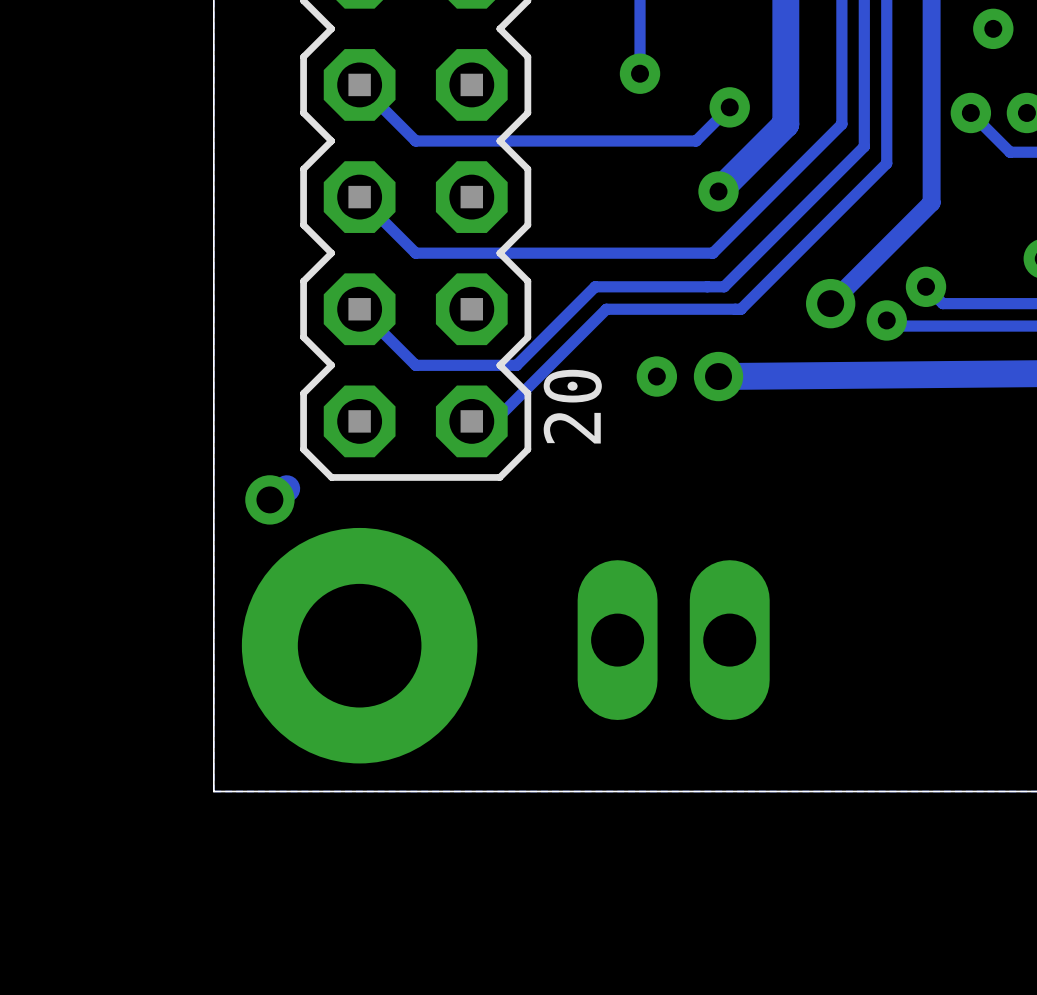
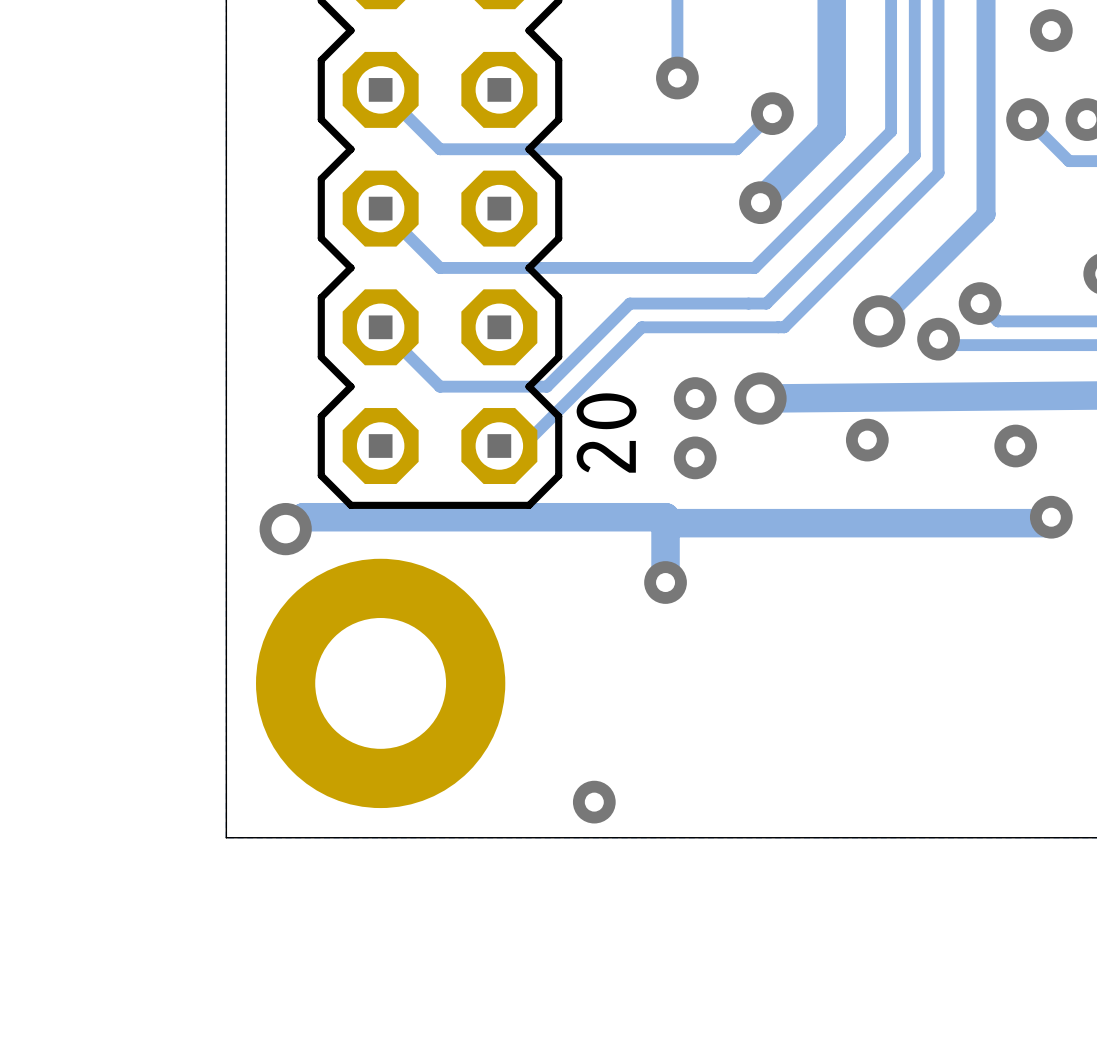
via: none -> (867, 440)
via: none -> (1015, 446)
via: none -> (695, 457)
track: none -> (303, 517) (665, 517) (665, 582)
track: none -> (1051, 517) (1045, 523) (665, 523)
via: none -> (1051, 517)
via: none -> (665, 582)
part: (673, 640) -> none
via: none -> (594, 802)

